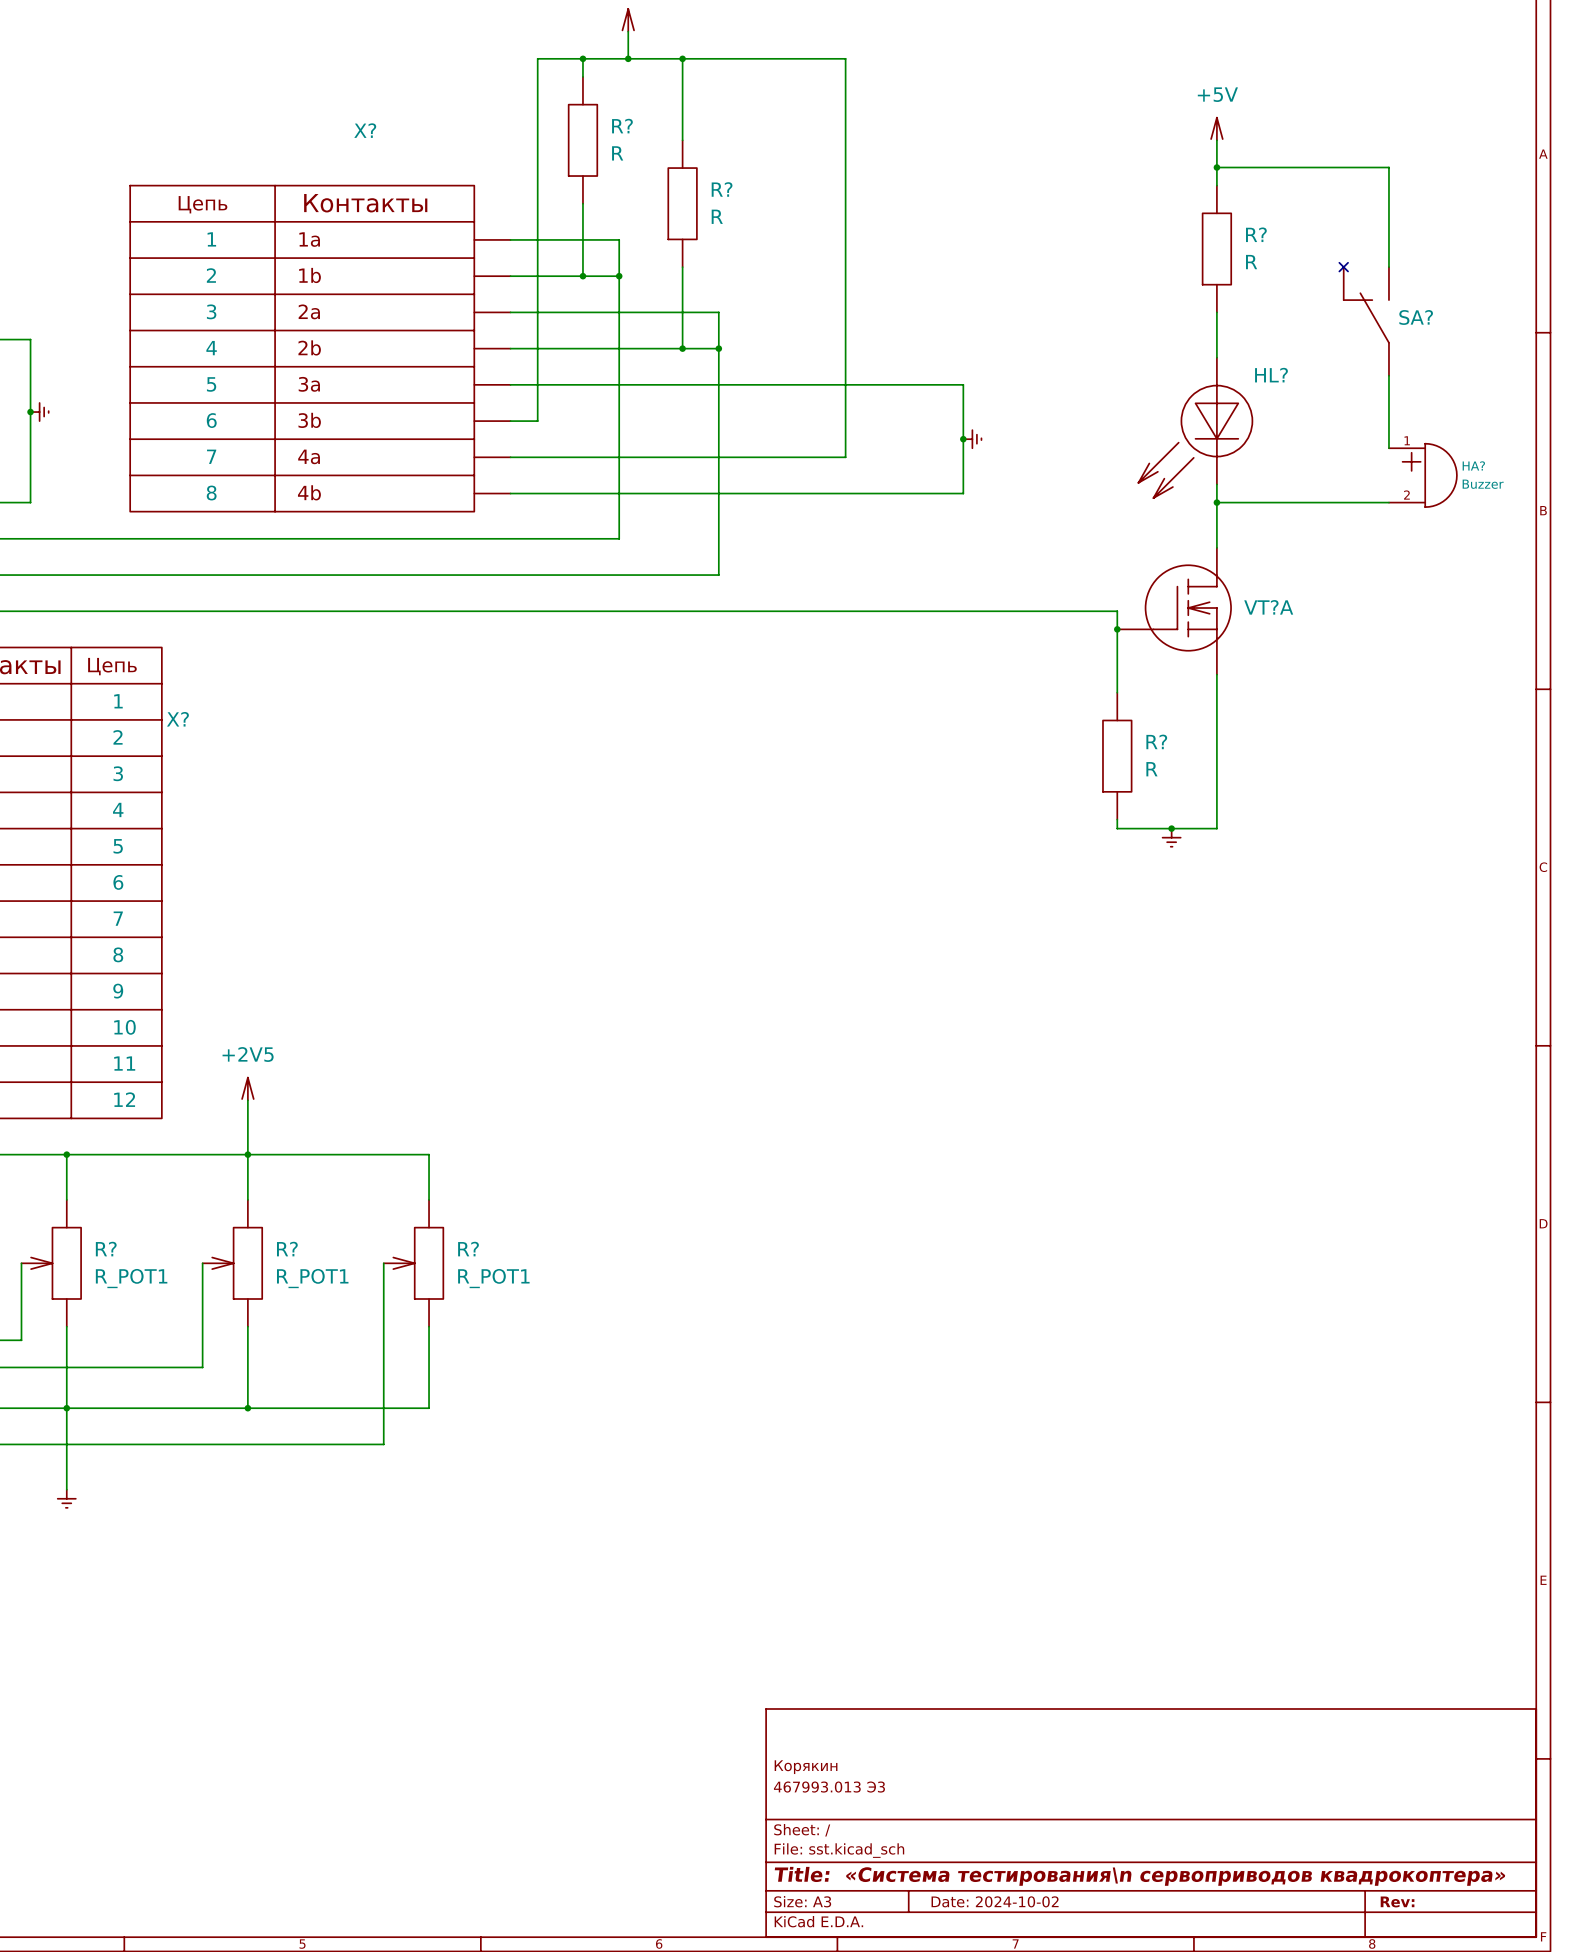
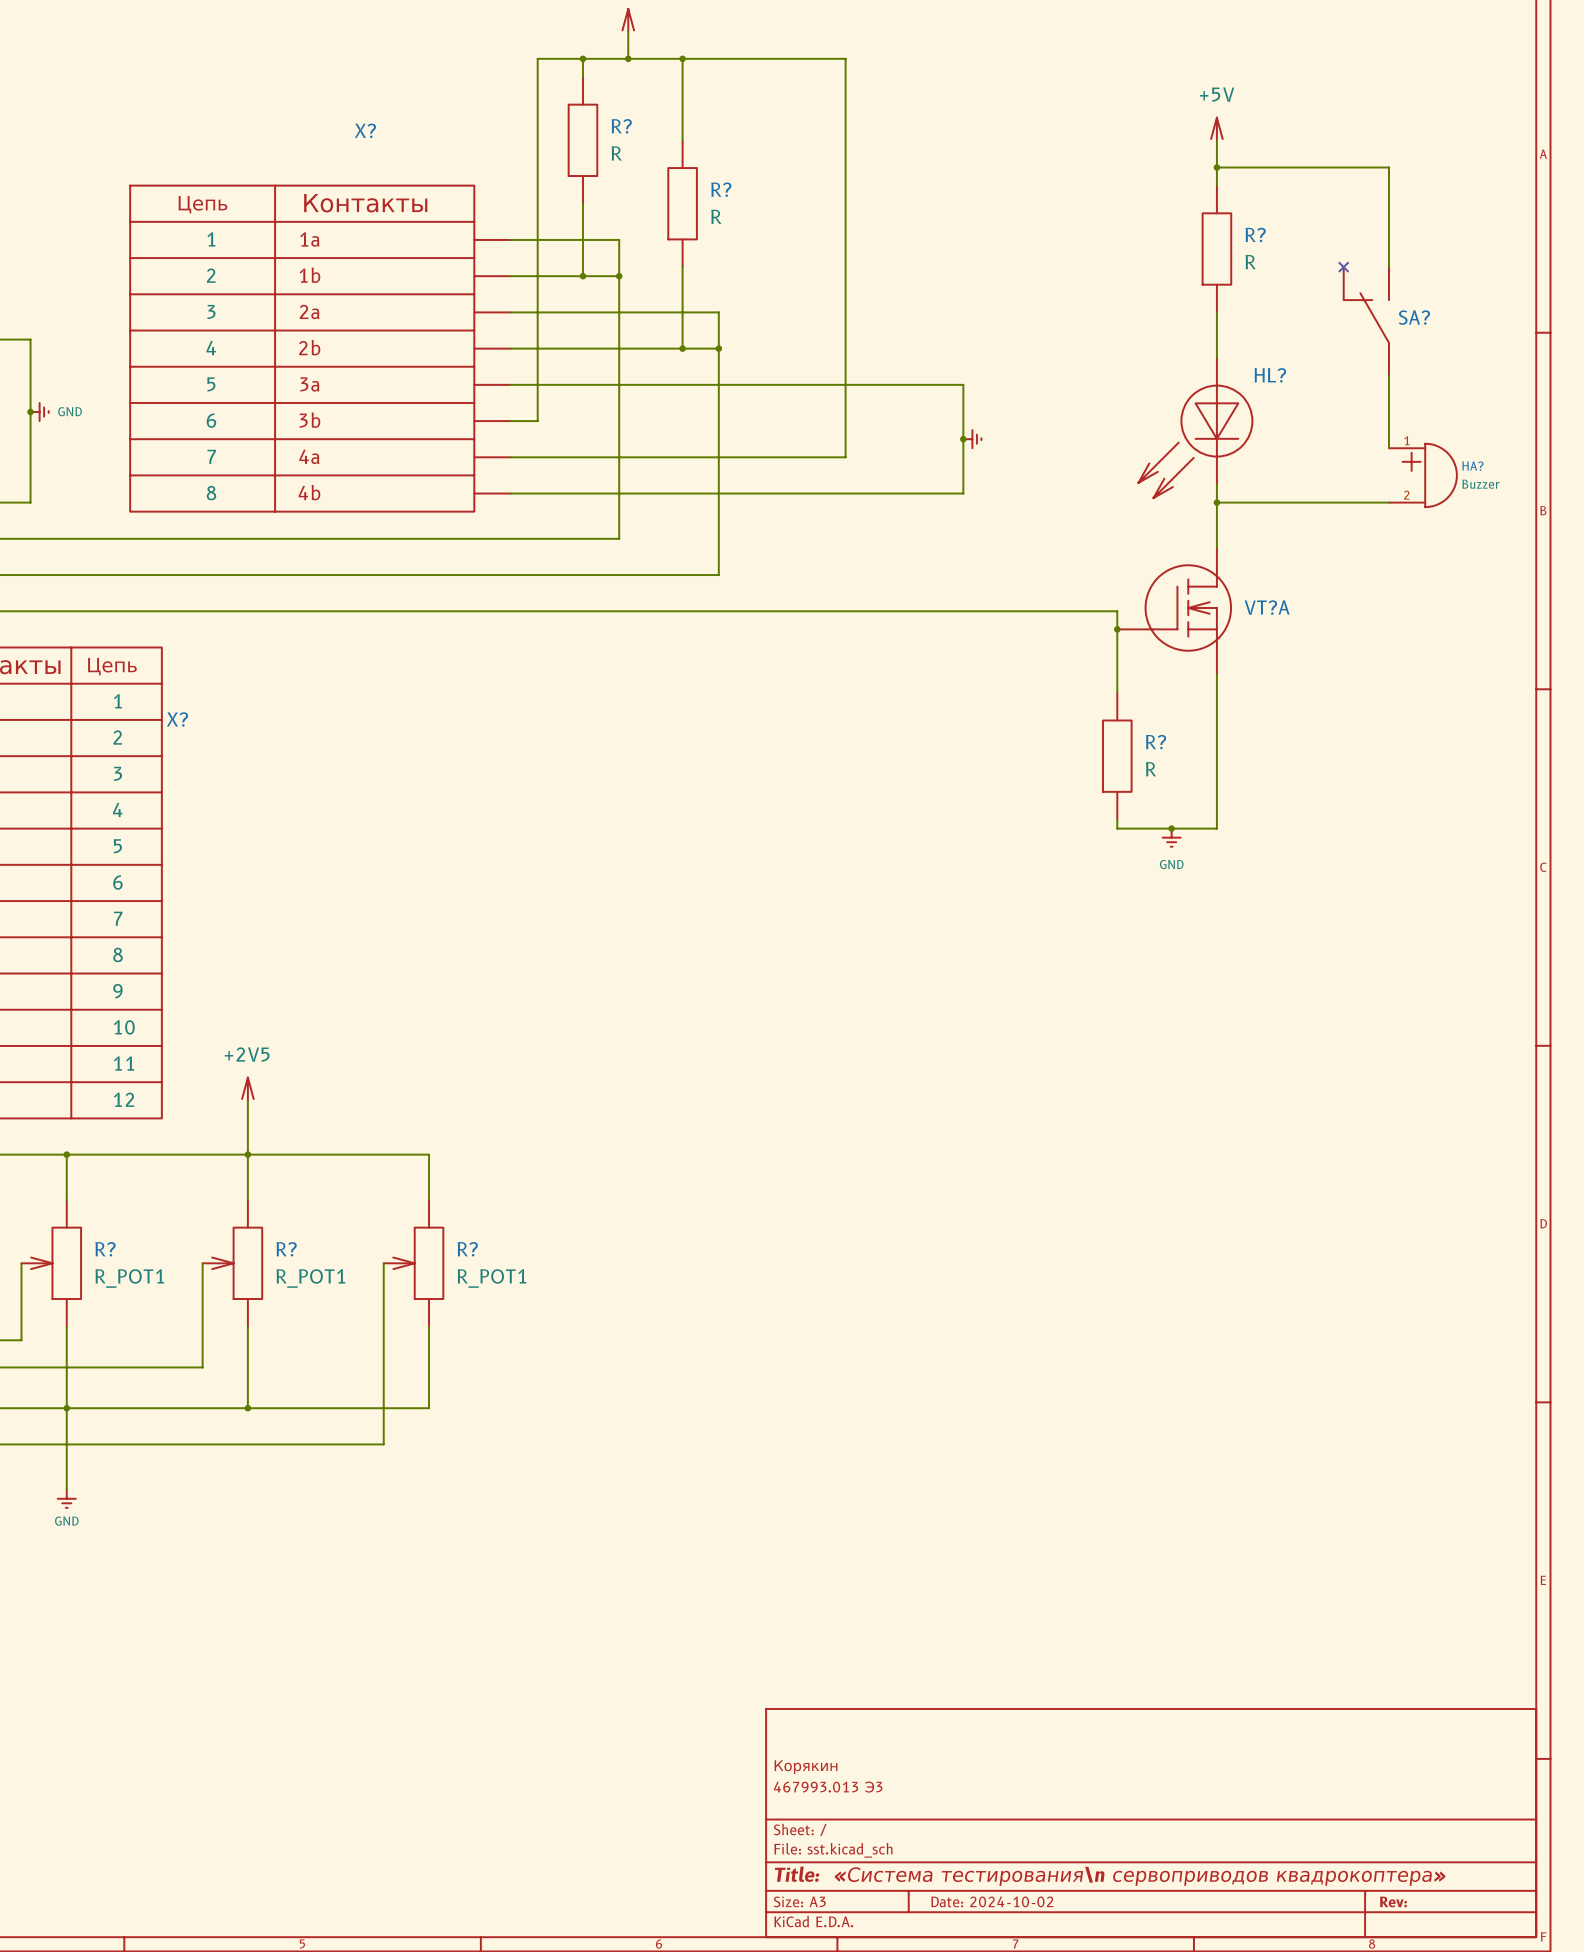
power symbol text: none -> GND (70, 411)
power symbol text: none -> GND (1171, 864)
power symbol text: none -> GND (66, 1521)

